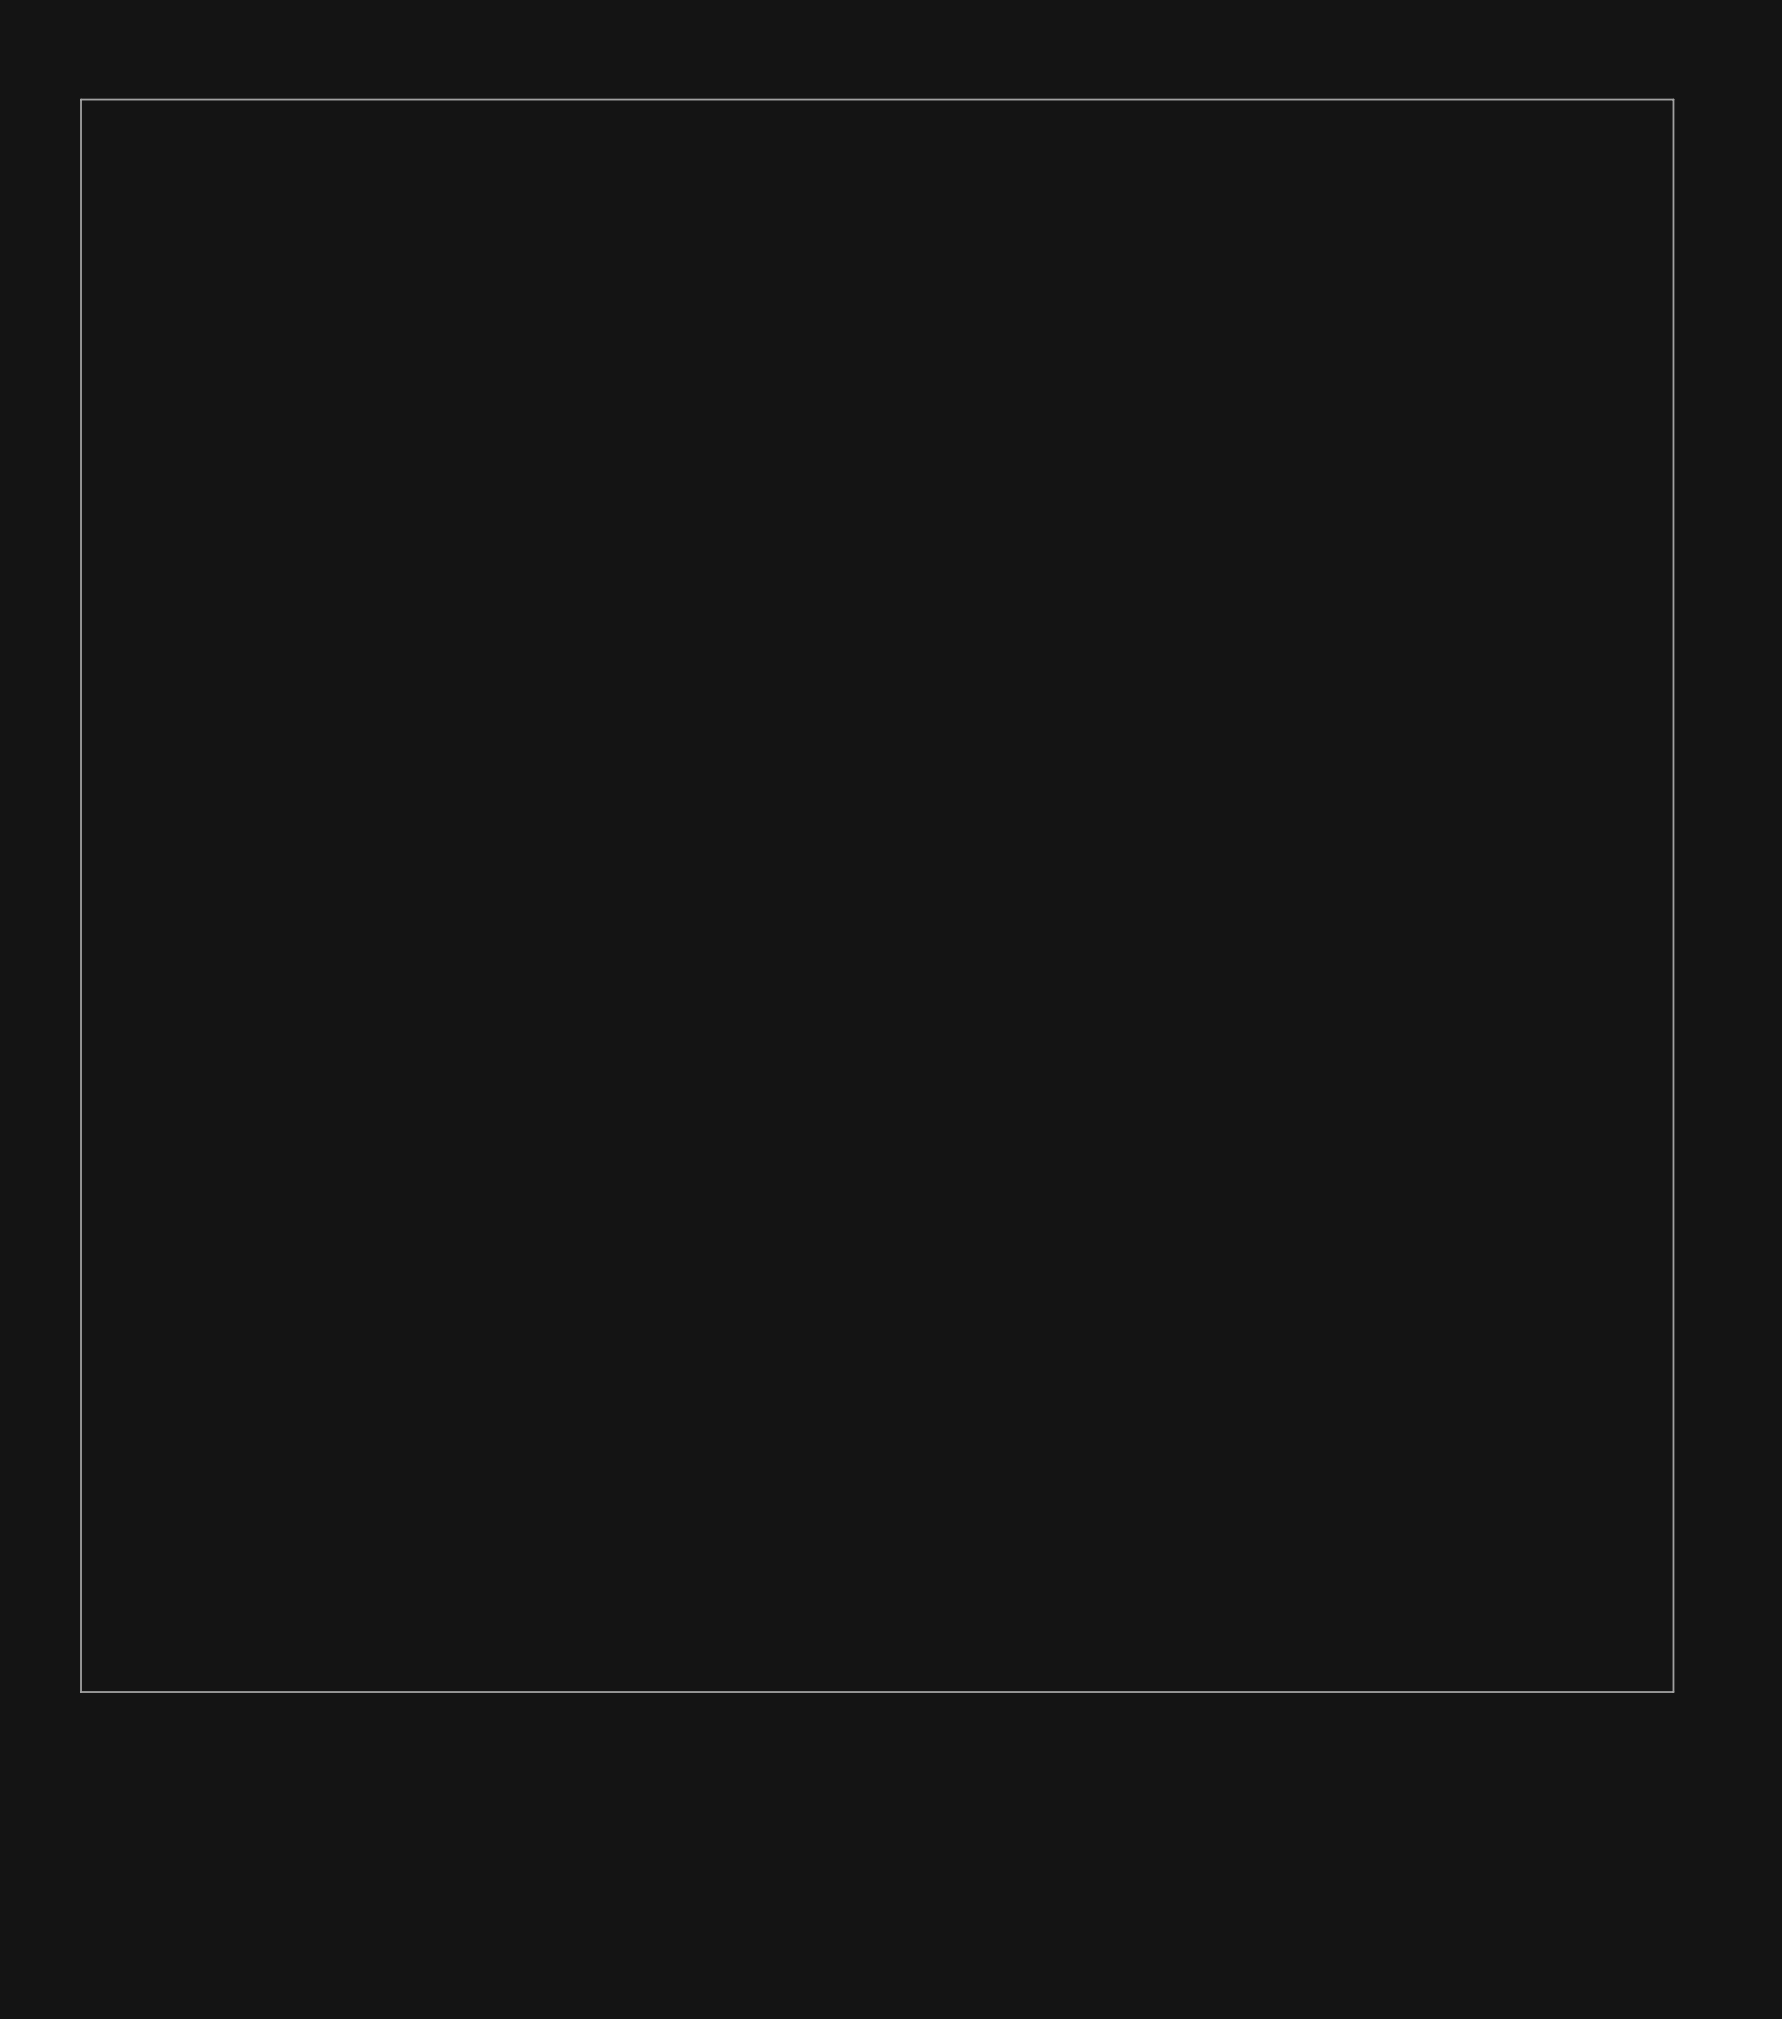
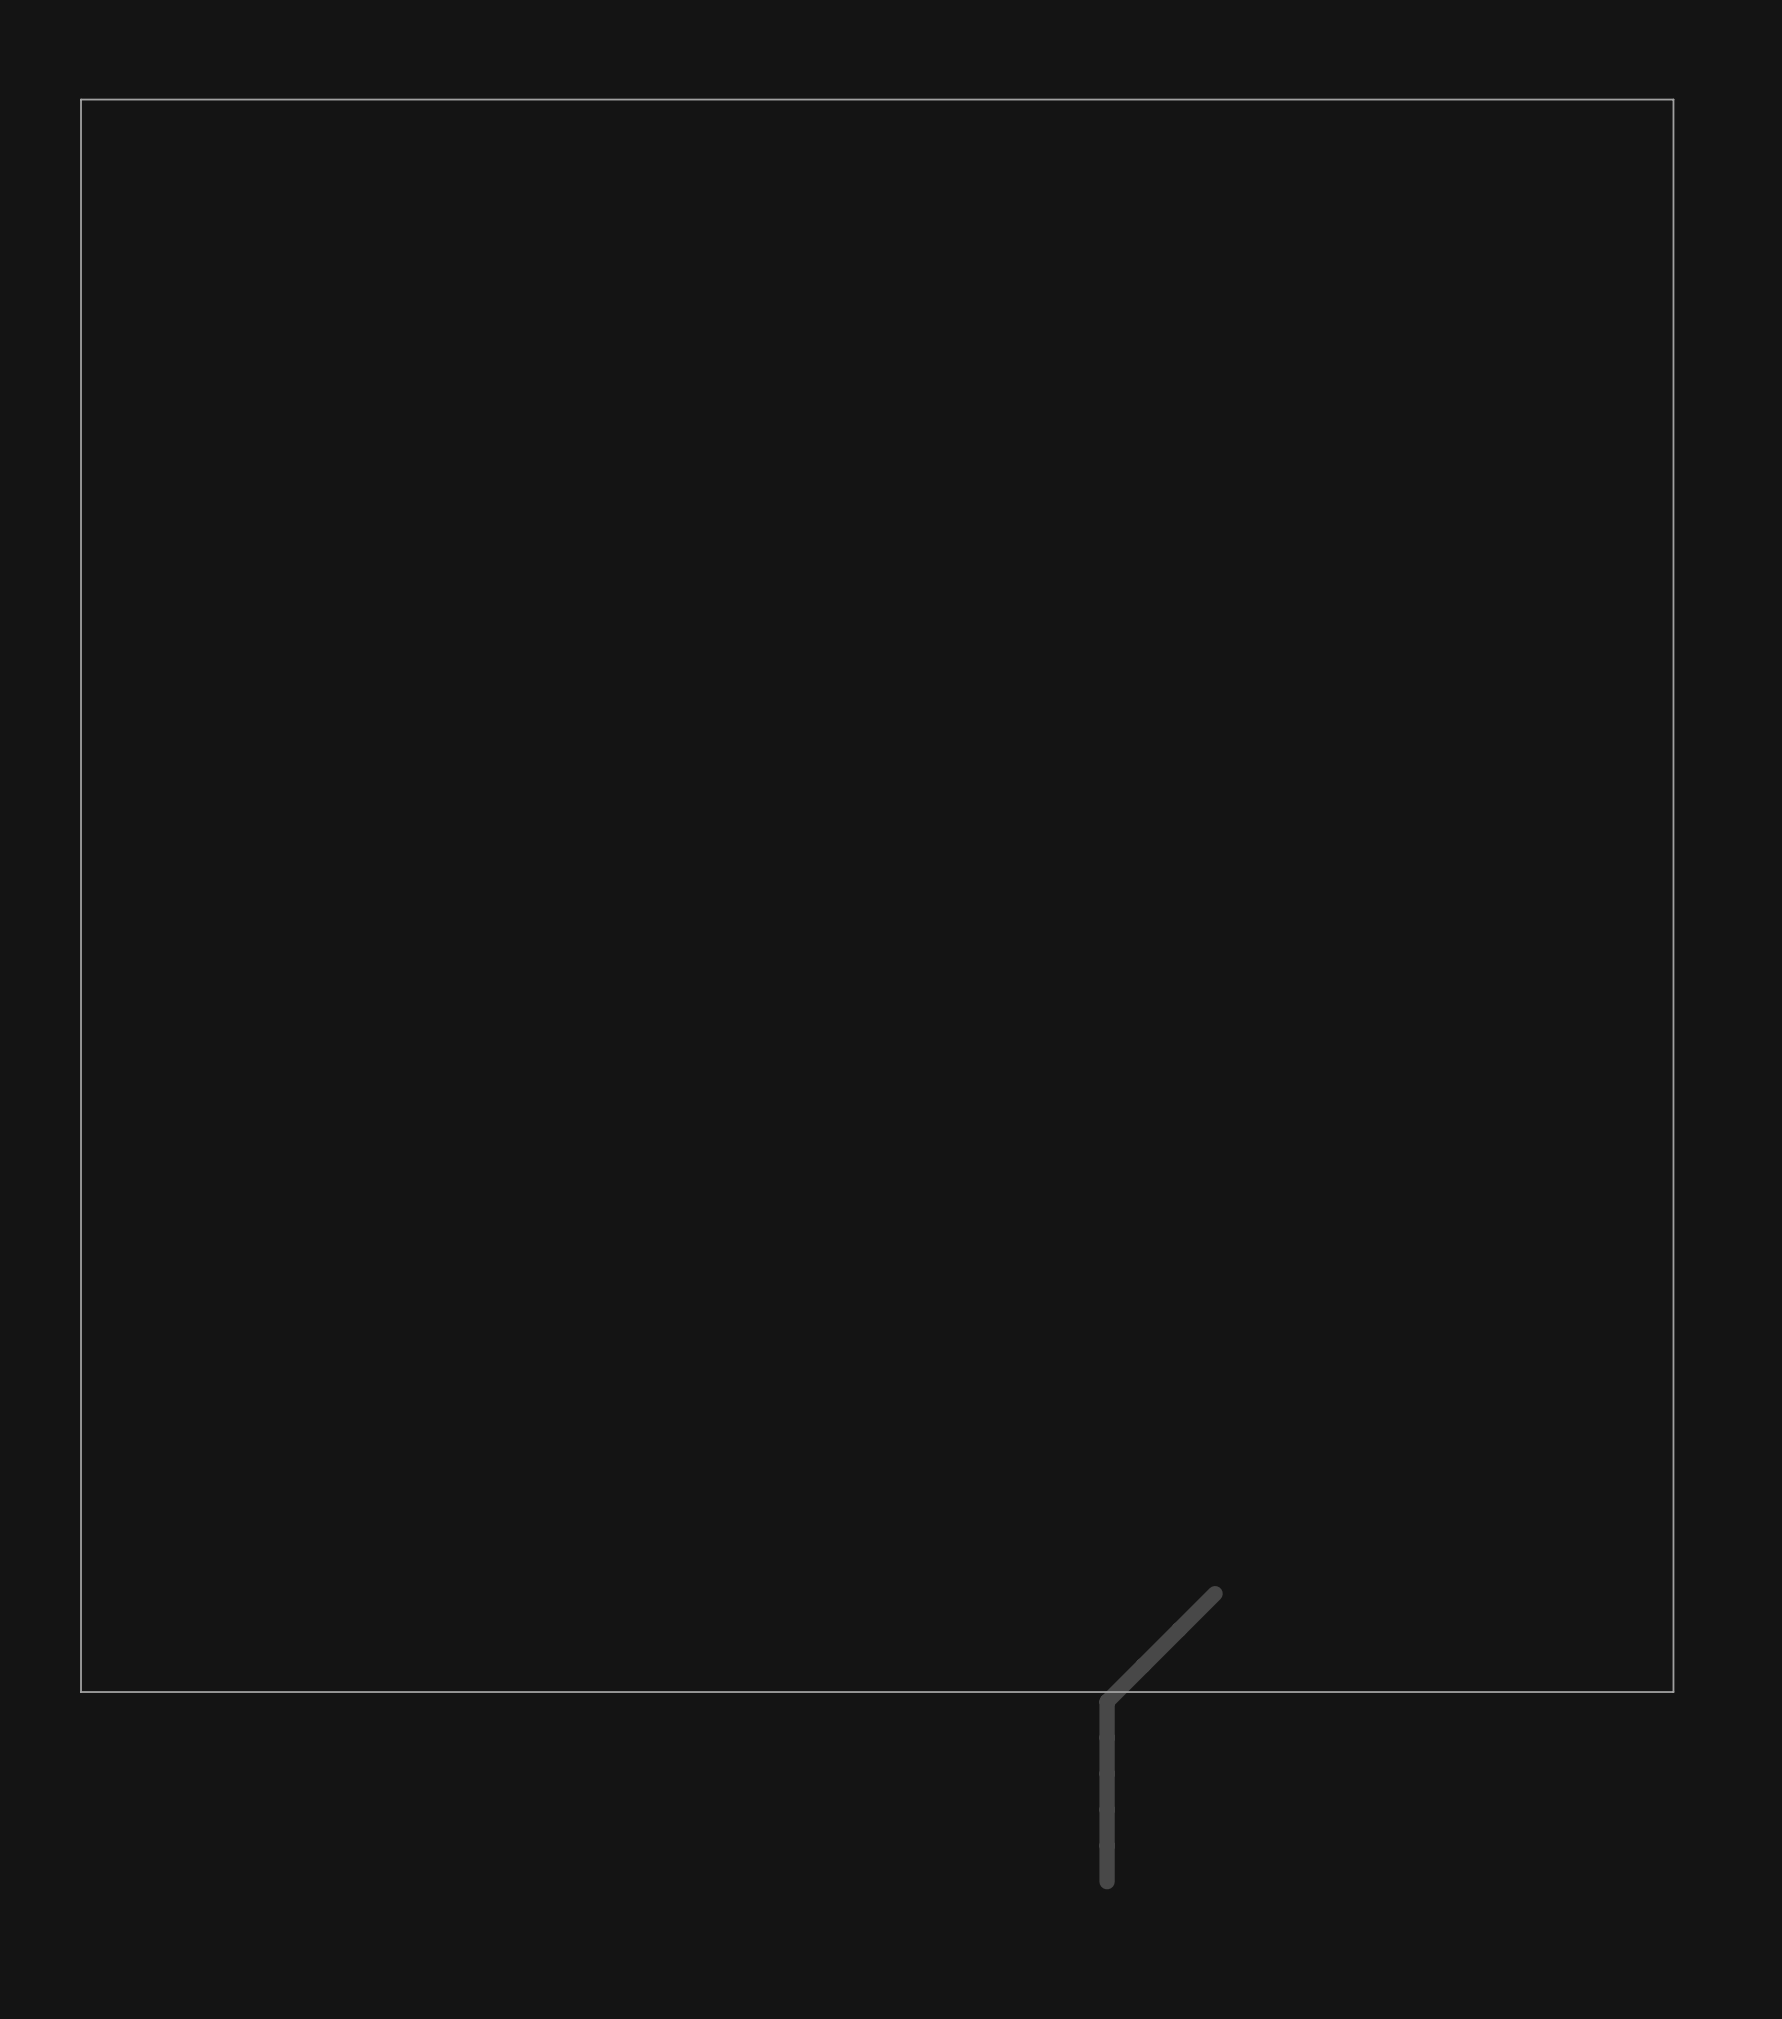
track: none -> (1215, 1593) (1107, 1701) (1107, 1881)

